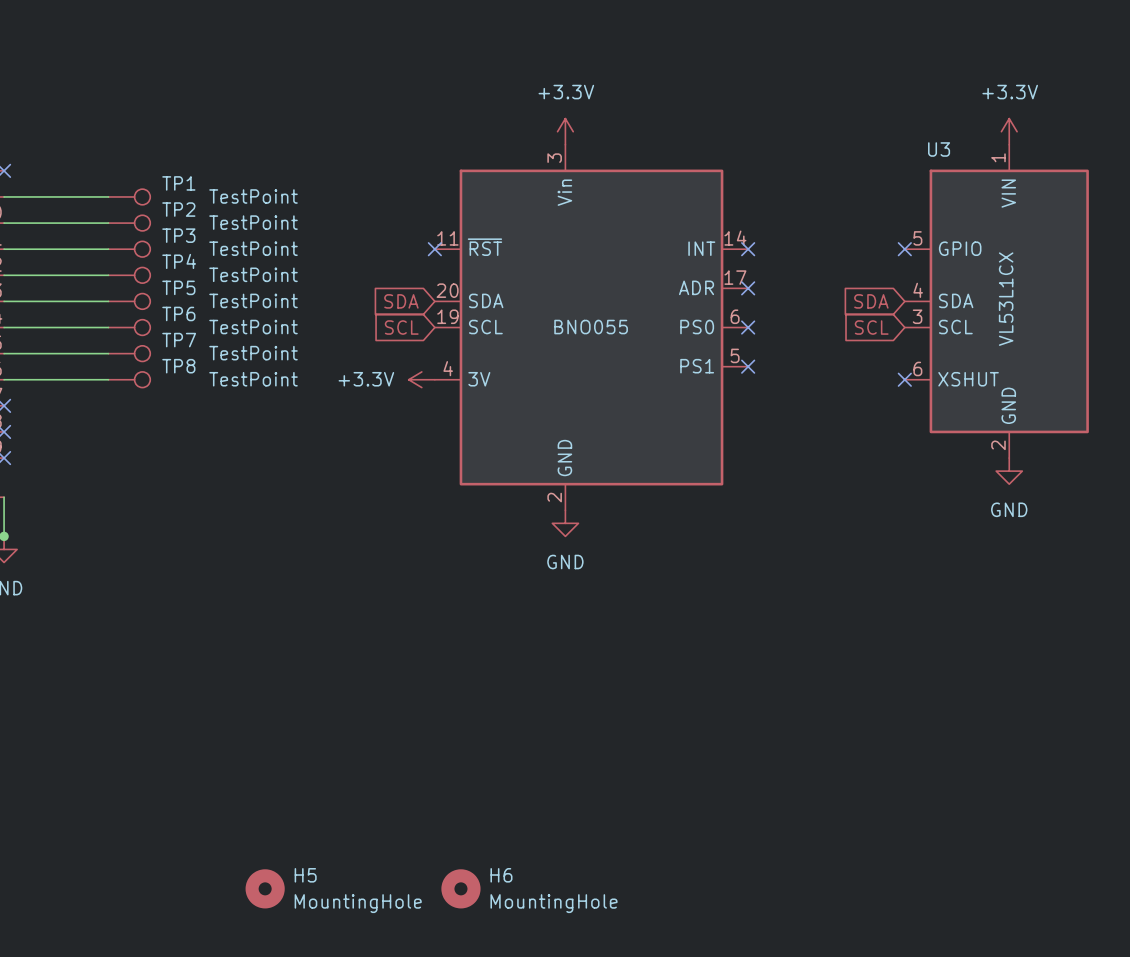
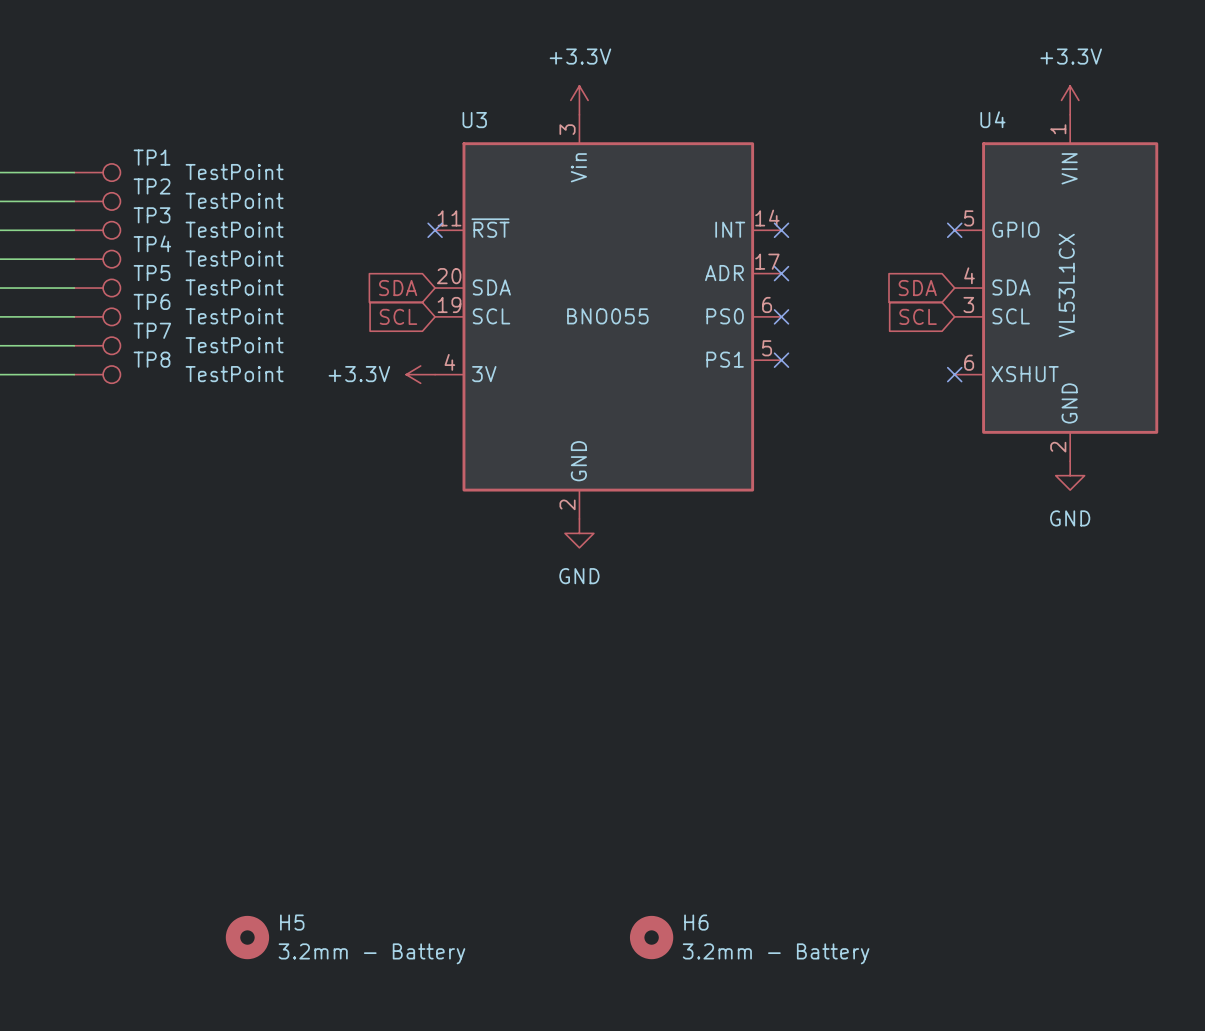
U3 name: none -> U3 (474, 120)
U3 name: U3 (939, 149) -> U4 (992, 119)
H6 position: (460, 888) -> (651, 937)
H5 value: MountingHole (358, 903) -> 3.2mm - Battery (371, 953)
H6 value: MountingHole (554, 903) -> 3.2mm - Battery (776, 953)

